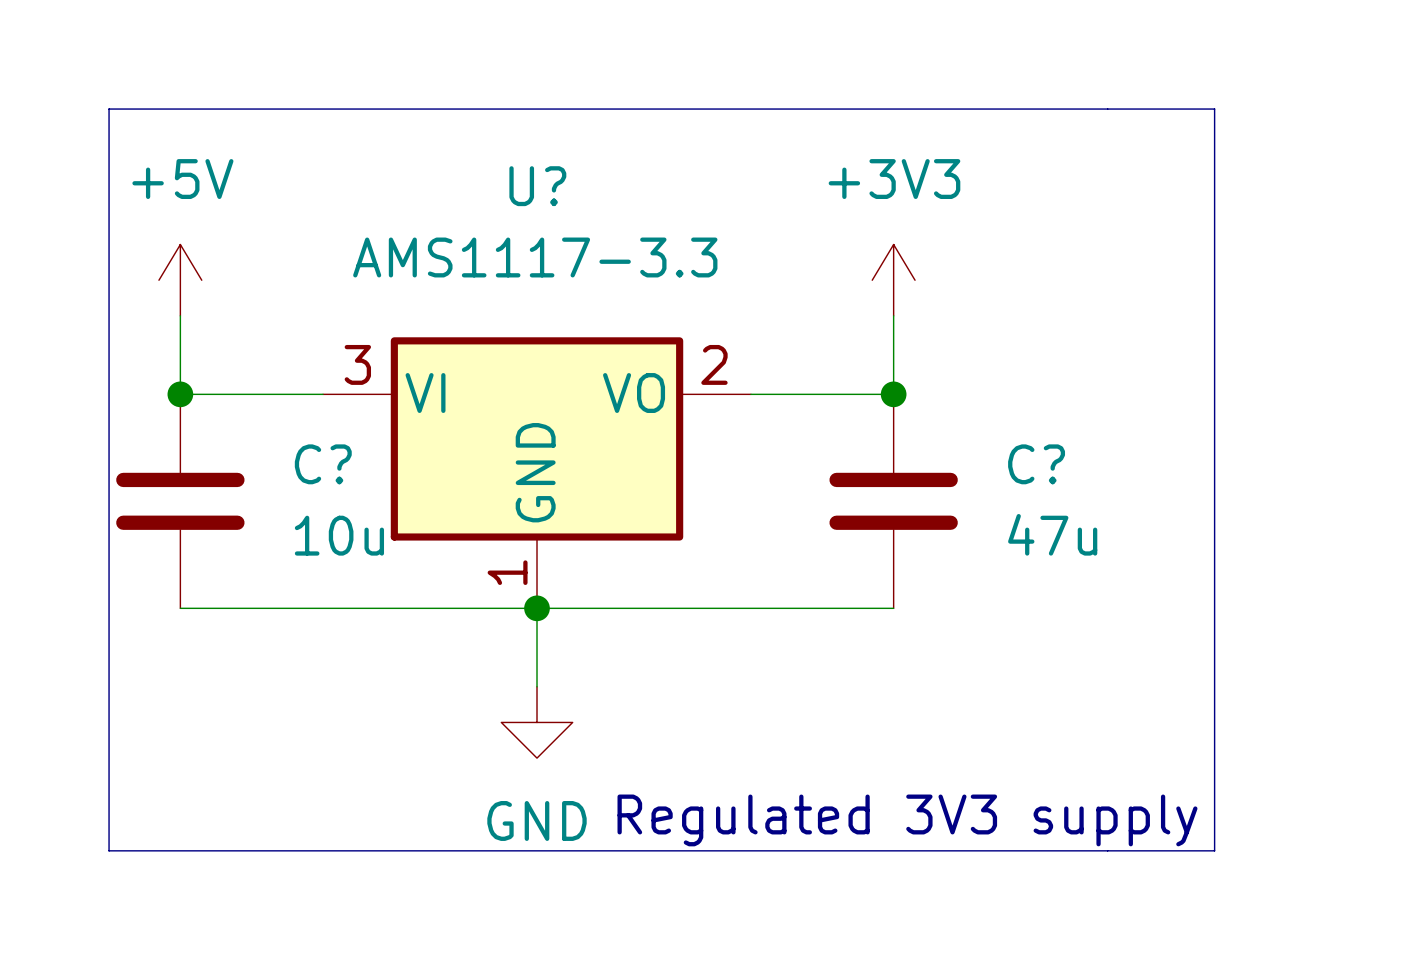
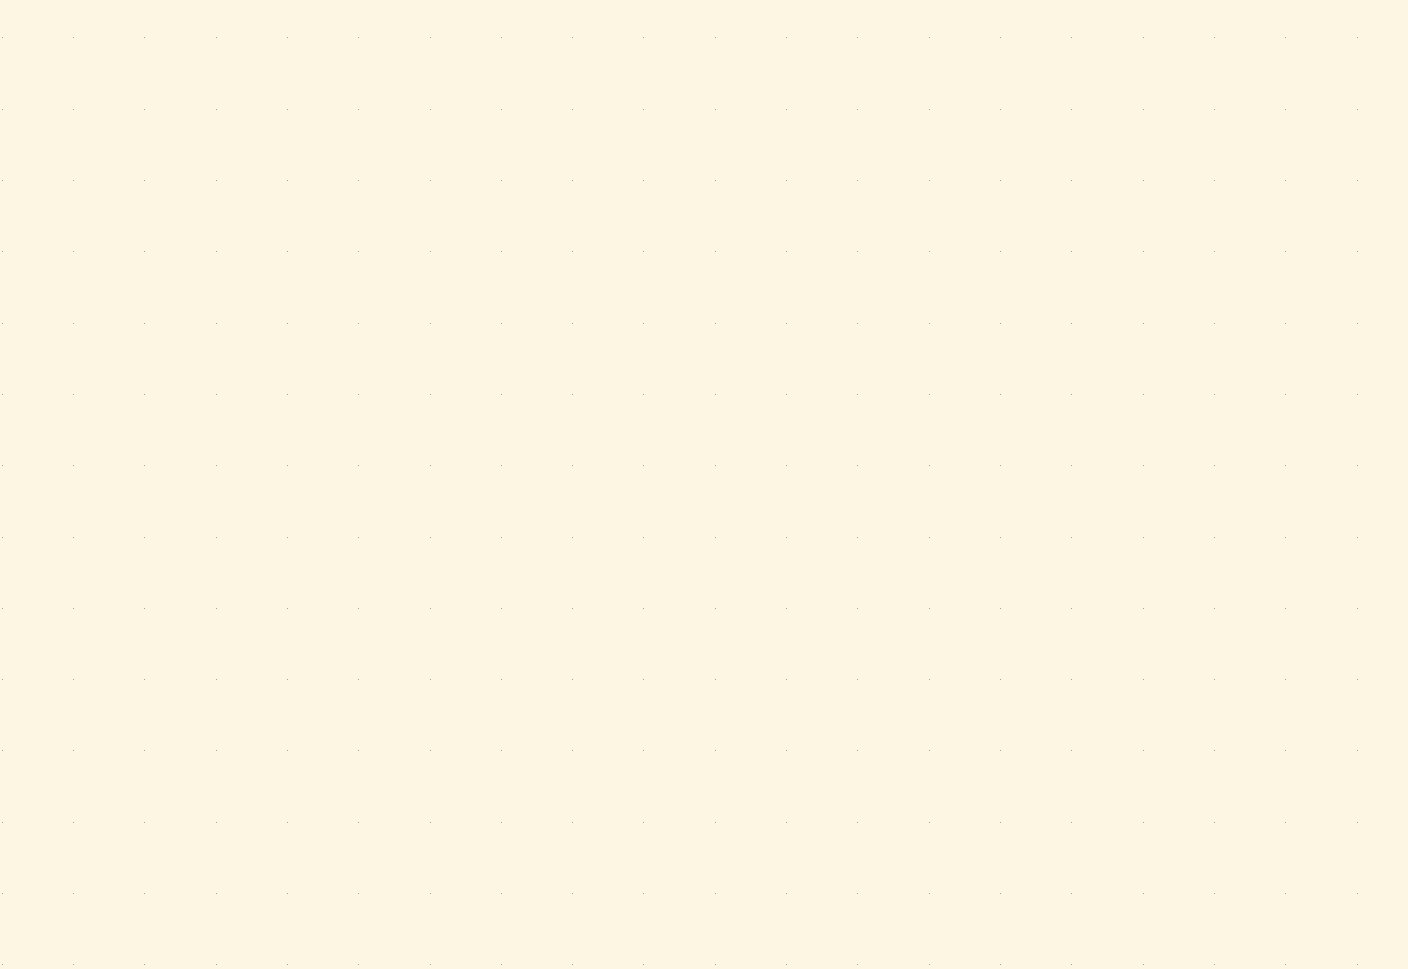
line: (109, 109) (1214, 109) (1214, 850) (109, 850) (109, 109) -> none
power symbol: +5V (180, 280) -> none
power symbol: +3V3 (893, 280) -> none
wire: (180, 315) (180, 394) (323, 394) -> none
wire: (893, 315) (893, 394) (750, 394) -> none
junction: (180, 394) -> none
junction: (893, 394) -> none
U?: AMS1117-3.3 (537, 472) -> none
C?: 10u (180, 501) -> none
C?: 47u (893, 501) -> none
wire: (180, 608) (893, 608) -> none
wire: (537, 608) (537, 686) -> none
junction: (537, 608) -> none
power symbol: GND (537, 722) -> none
text: Regulated 3V3 supply (907, 820) -> none

